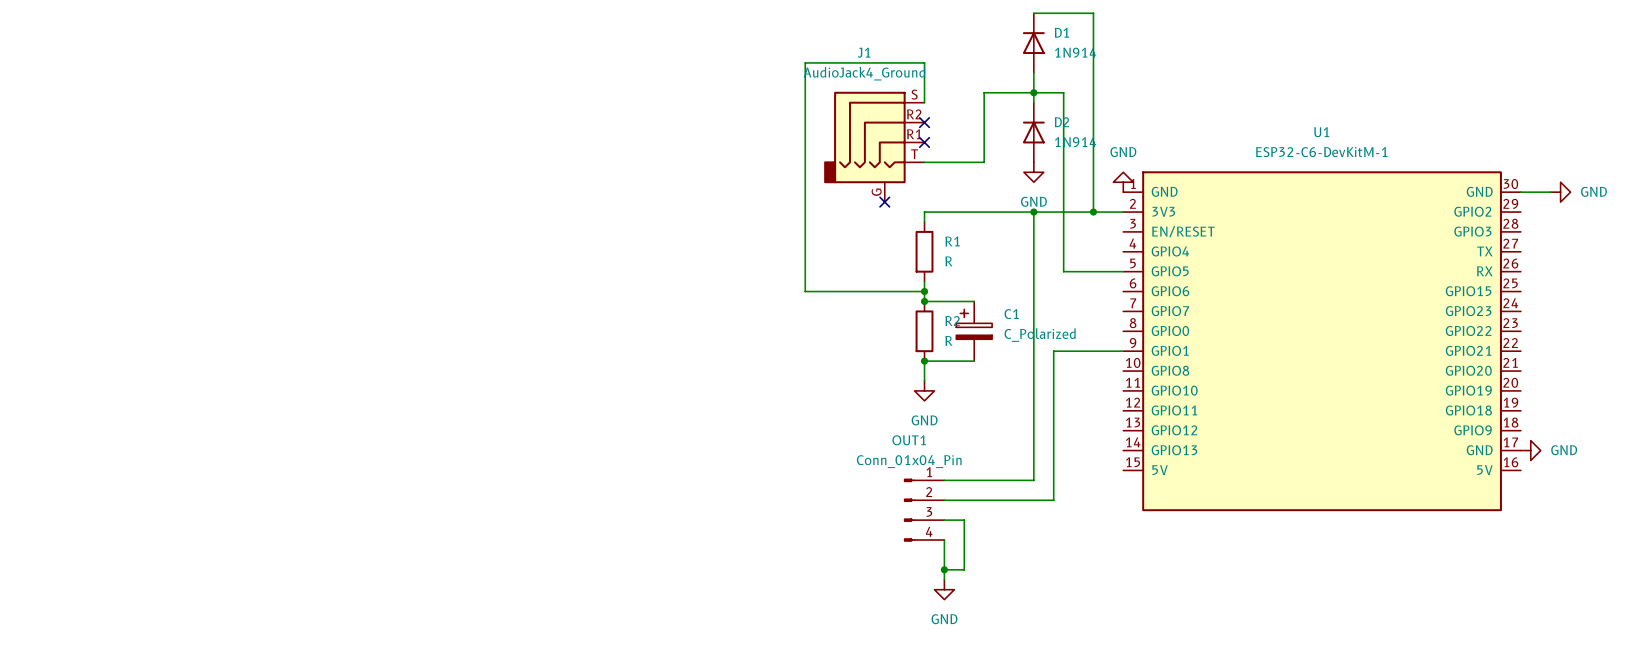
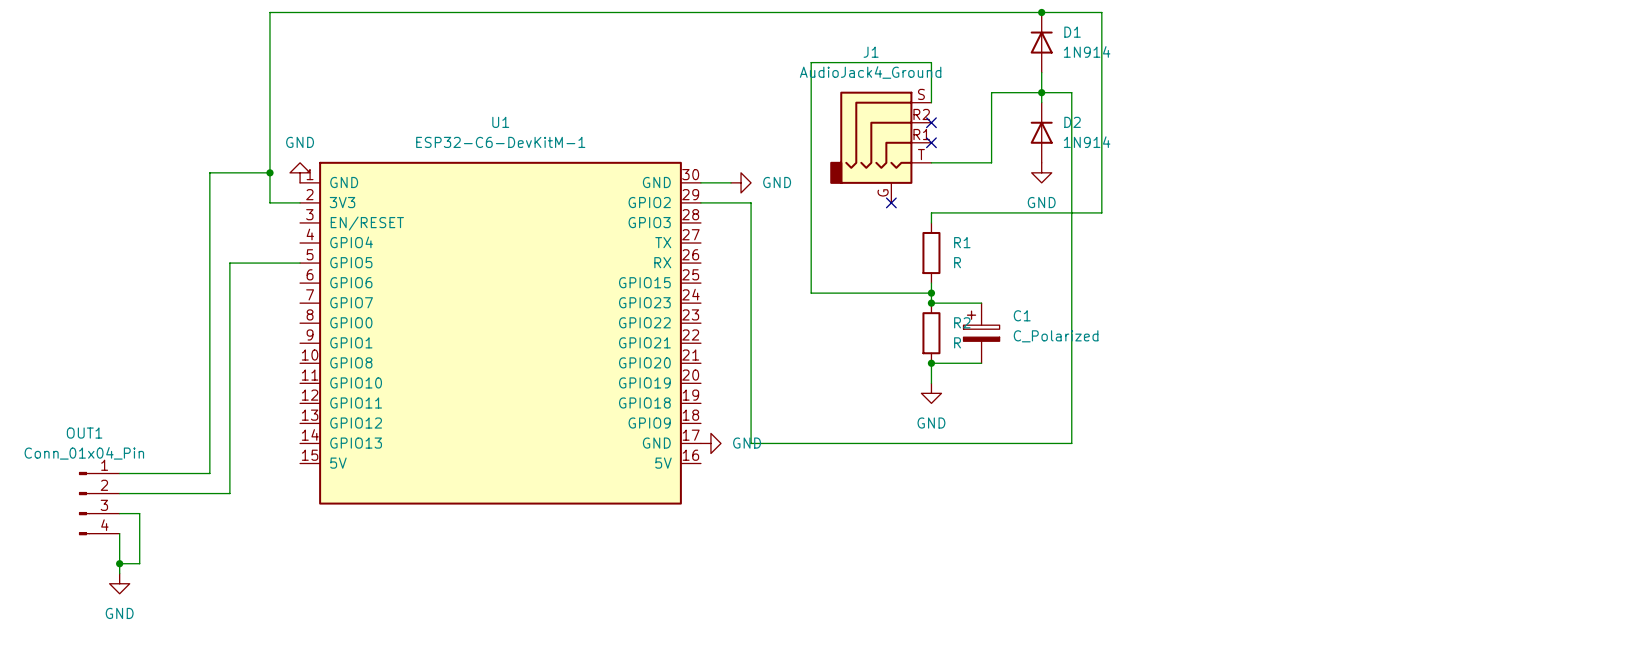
wire: none -> (1041, 12) (269, 12) (269, 202) (300, 202)
junction: none -> (1041, 12)
wire: none -> (269, 172) (209, 172) (209, 473) (119, 473)
junction: none -> (269, 172)
power symbol: none -> GND (300, 172)
wire: none -> (700, 182) (731, 182)
power symbol: none -> GND (741, 182)
power symbol: GND (1123, 182) -> none
wire: (1520, 192) (1550, 192) -> none
power symbol: GND (1560, 192) -> none
wire: (1033, 212) (1033, 480) (944, 480) -> none
junction: (1033, 212) -> none
wire: (1093, 212) (1123, 212) -> none
junction: (1093, 212) -> none
wire: none -> (300, 263) (229, 263) (229, 493) (119, 493)
wire: (1063, 271) (1123, 271) -> (1071, 273) (1071, 443) (751, 443) (751, 202) (700, 202)
U1 position: (1322, 341) -> (500, 333)
wire: (1123, 351) (1053, 351) (1053, 500) (944, 500) -> none
power symbol: none -> GND (710, 443)
power symbol: GND (1530, 450) -> none
wire: none -> (119, 513) (139, 513) (139, 563) (119, 563)
OUT1 position: (924, 510) -> (99, 503)
wire: (944, 520) (964, 520) (964, 569) (944, 569) -> none
wire: none -> (119, 533) (119, 573)
wire: (944, 540) (944, 579) -> none
junction: none -> (119, 563)
junction: (944, 569) -> none
power symbol: none -> GND (119, 583)
power symbol: GND (944, 589) -> none

